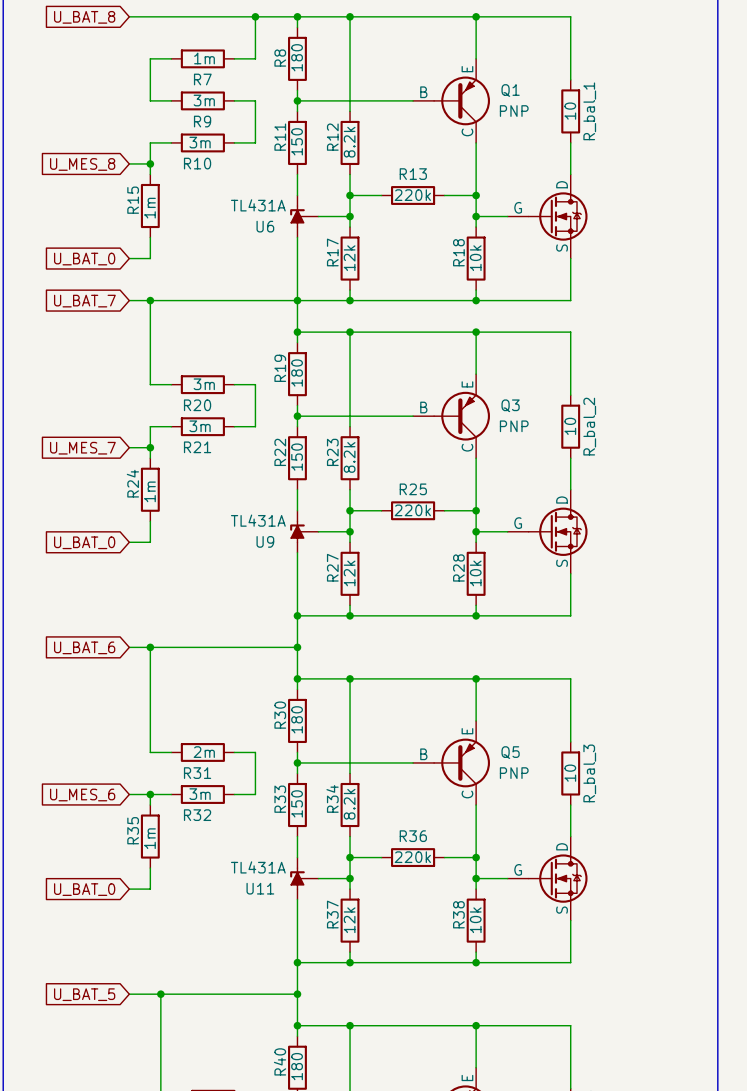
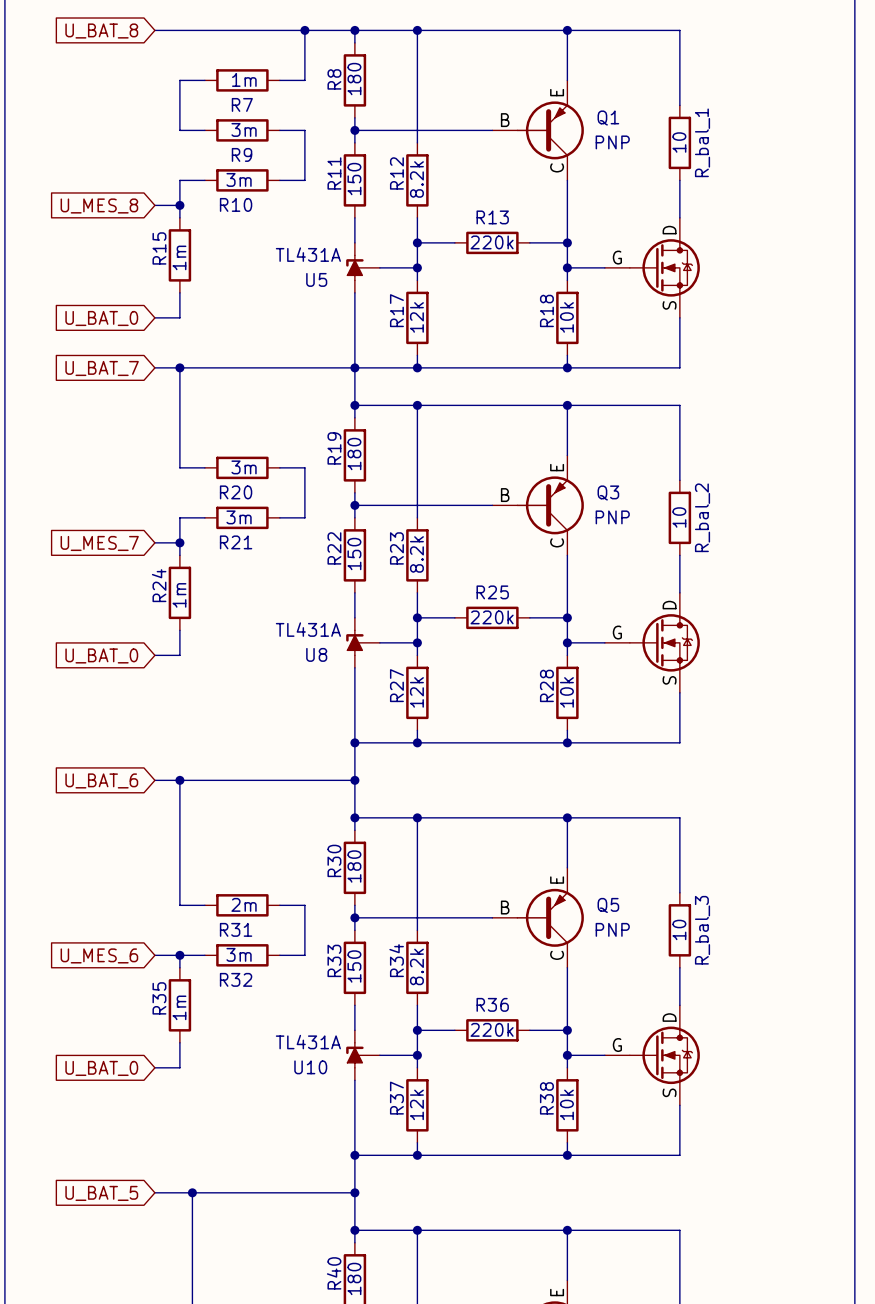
U6 name: U6 (265, 226) -> U5 (316, 279)
U9 name: U9 (265, 541) -> U8 (316, 654)
U11 name: U11 (260, 888) -> U10 (310, 1067)

